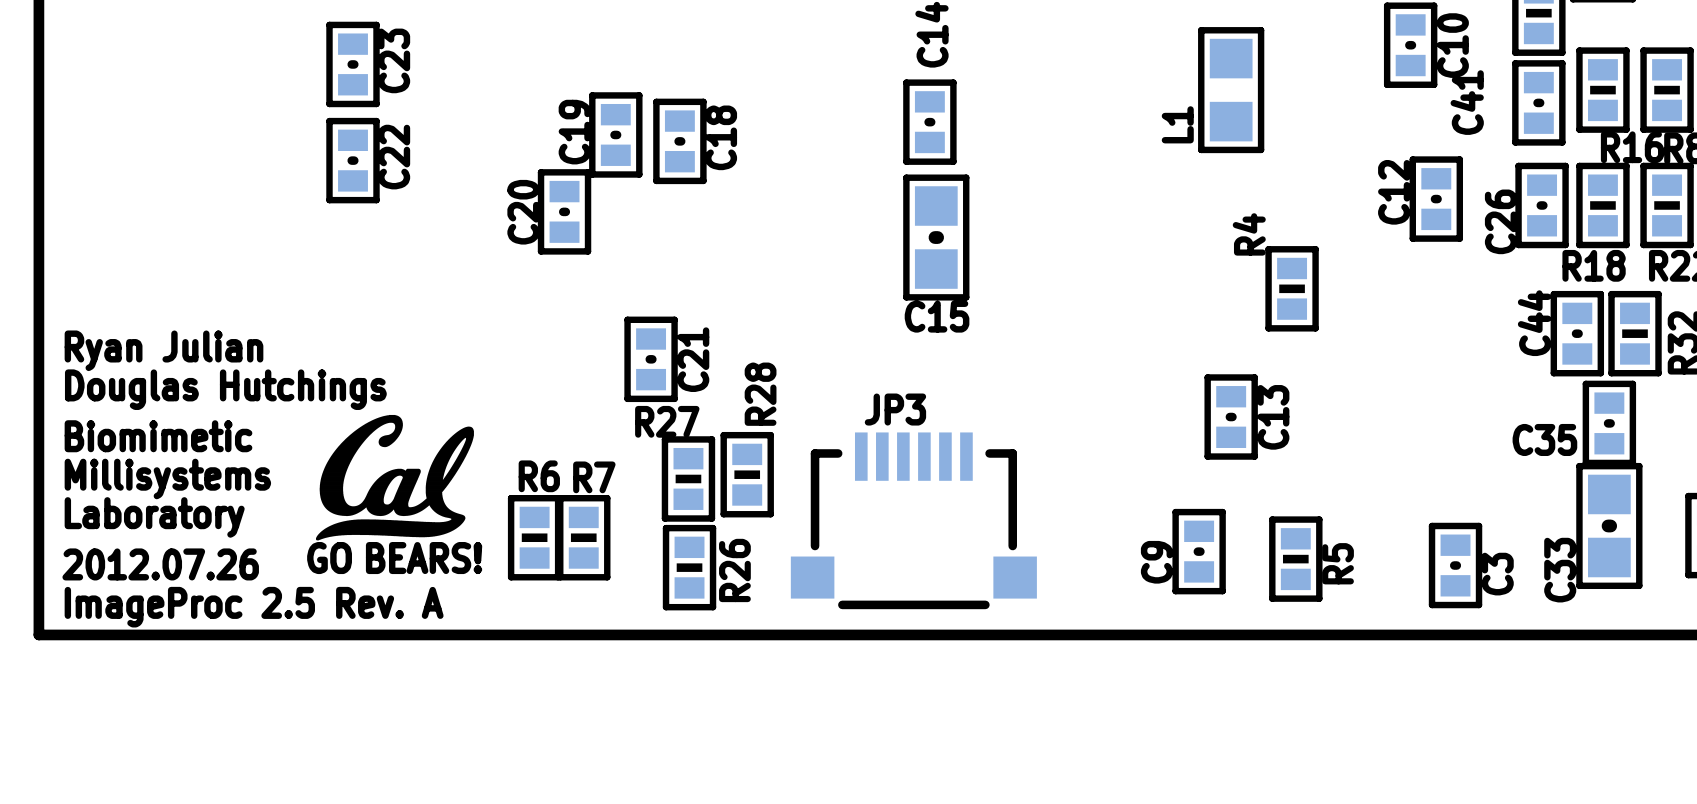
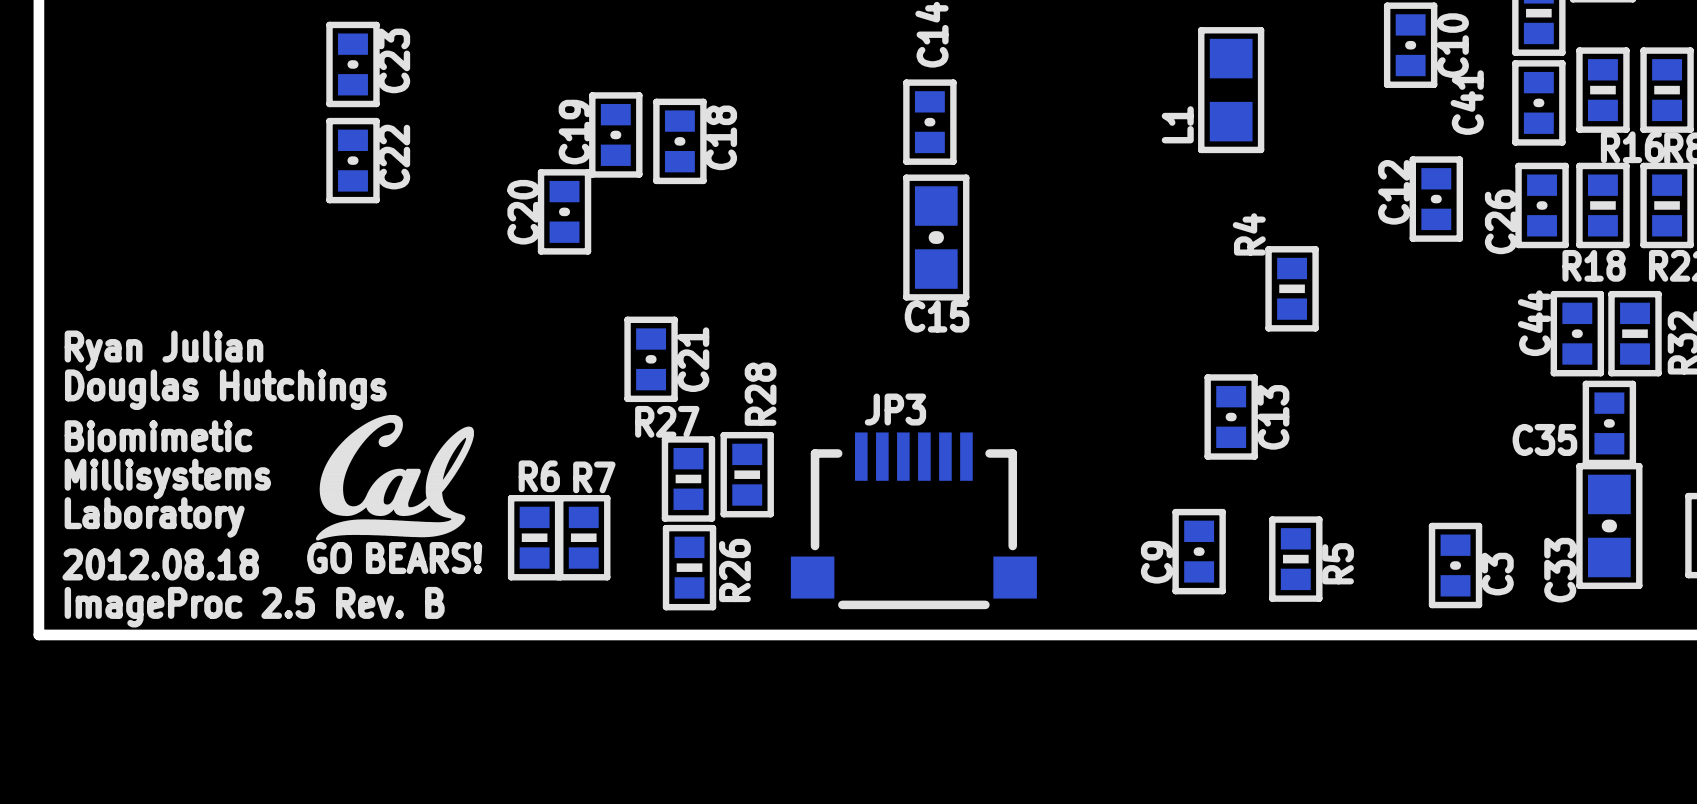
text: 2012.07.26 (160, 564) -> 2012.08.18 (160, 564)
text: ImageProc 2.5 Rev. A (254, 607) -> ImageProc 2.5 Rev. B (254, 607)

